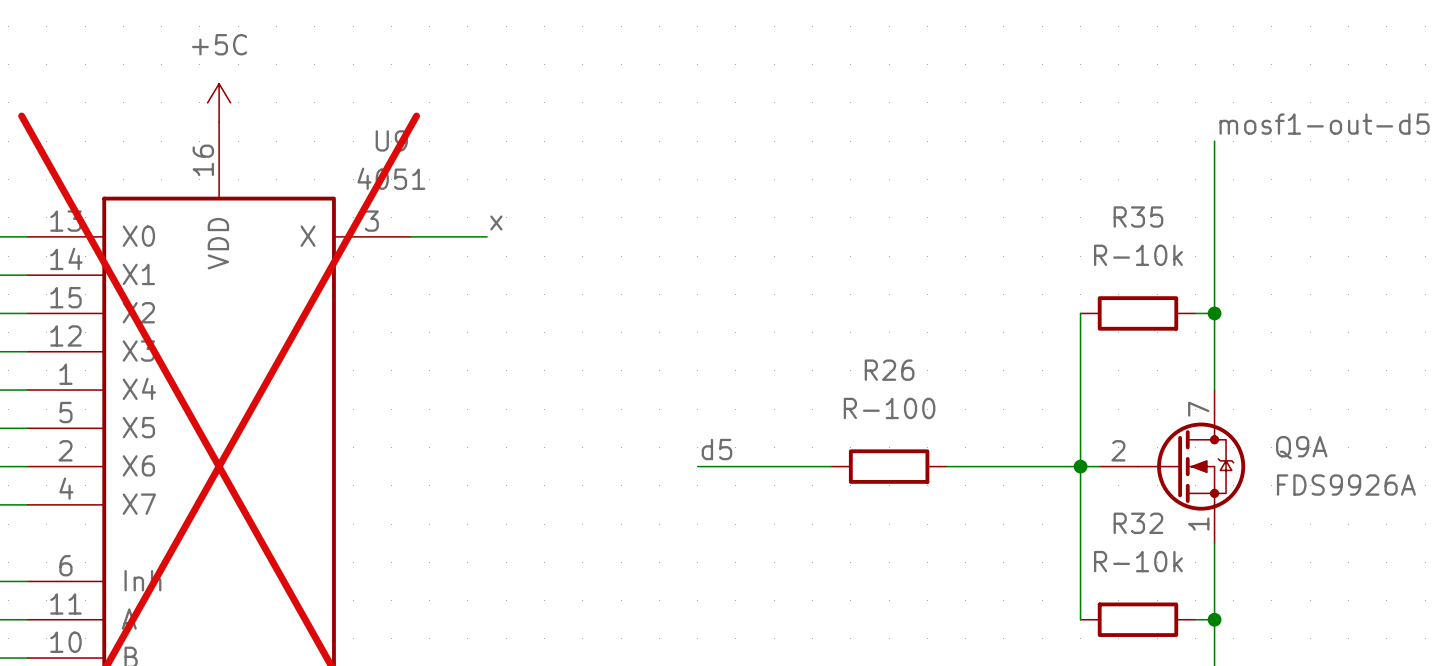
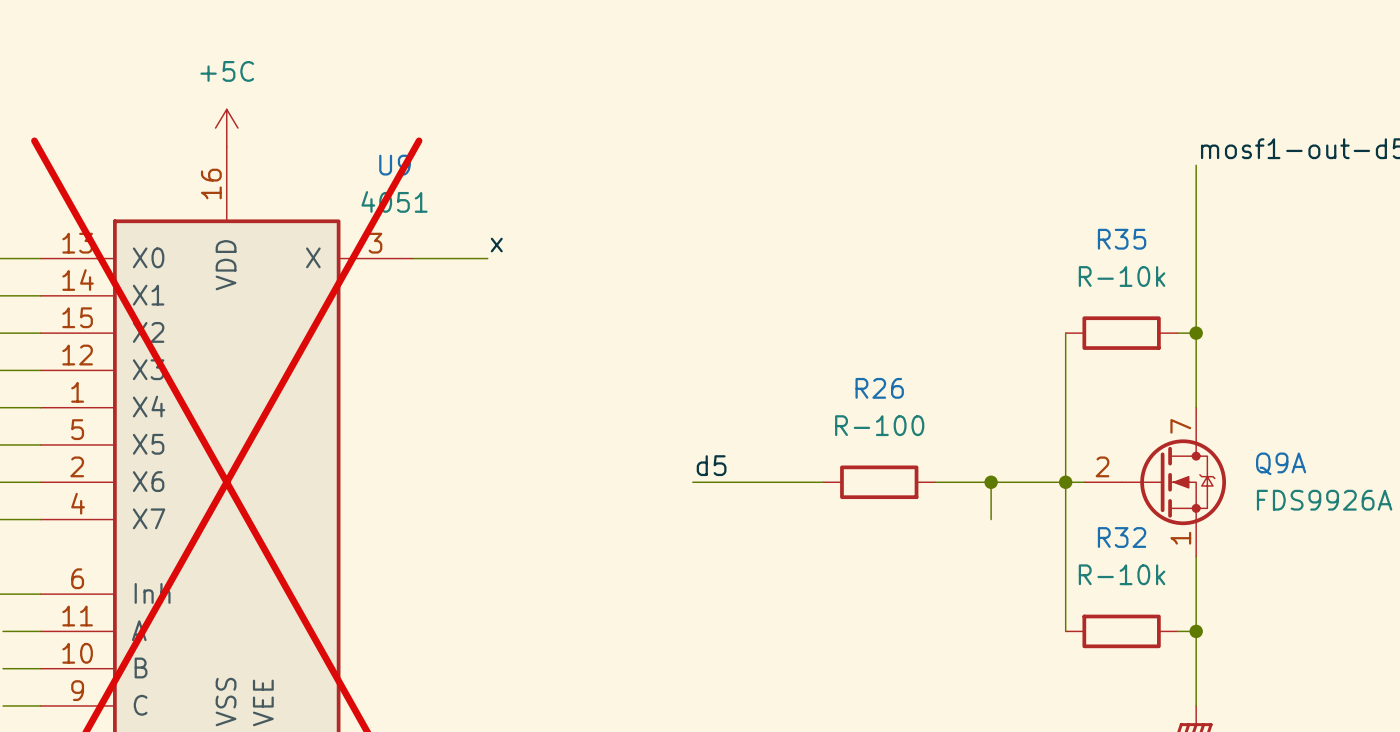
wire: none -> (991, 482) (991, 519)
junction: none -> (991, 482)

